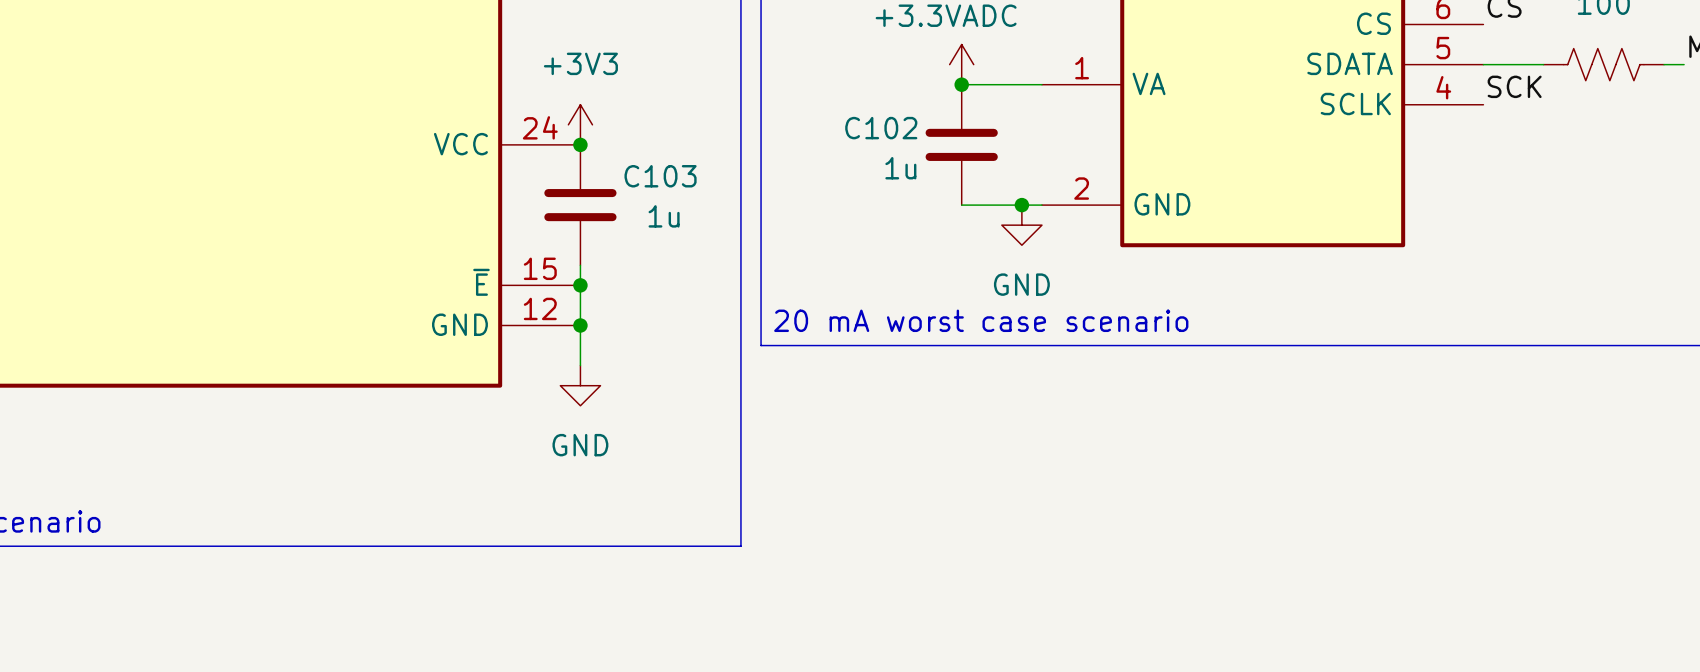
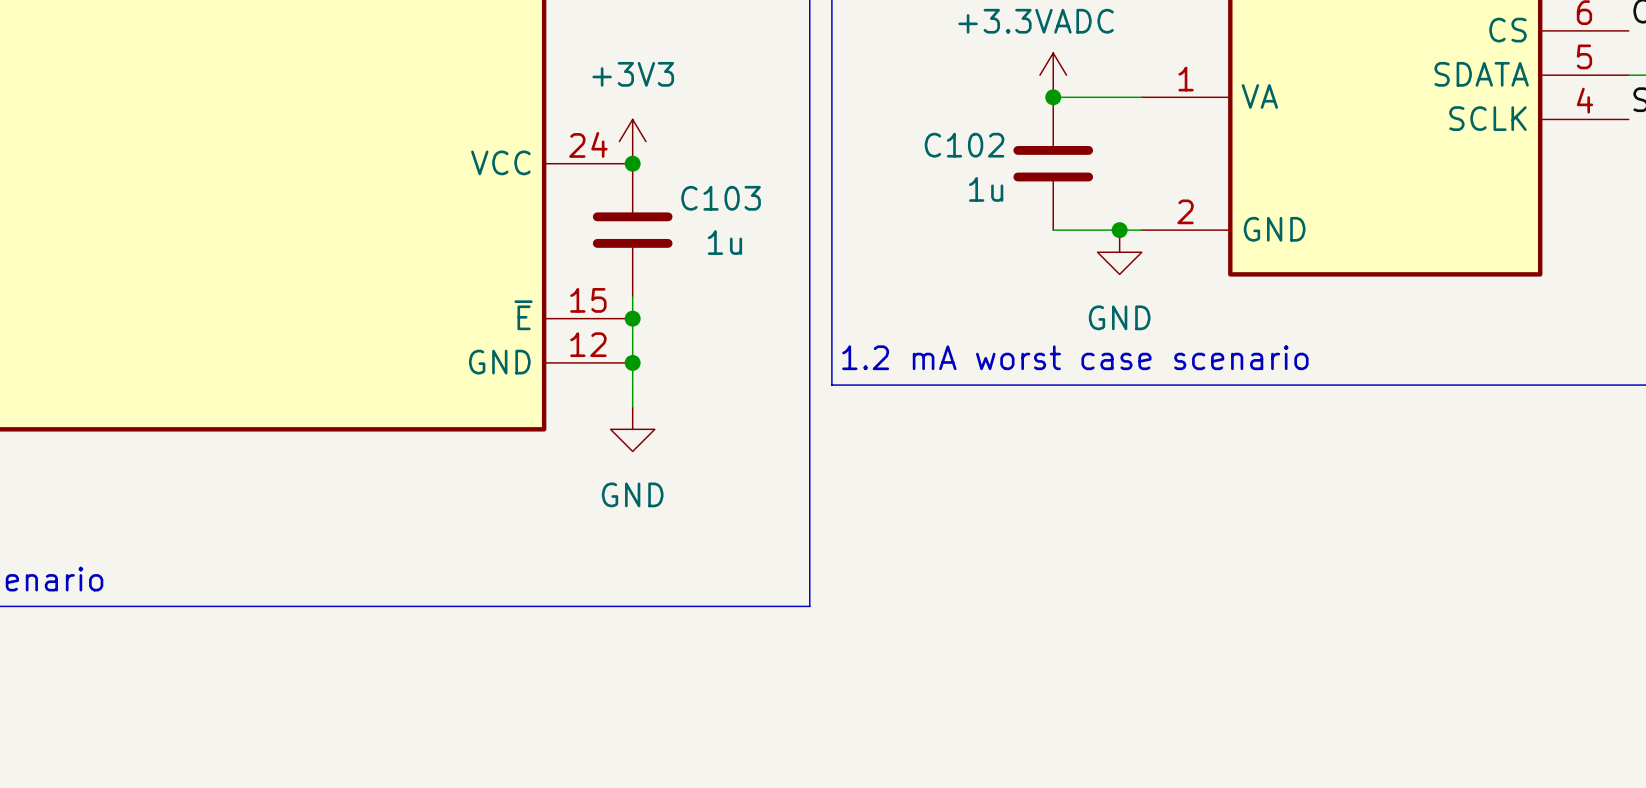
text: 20 mA worst case scenario (981, 320) -> 1.2 mA worst case scenario (1075, 357)

